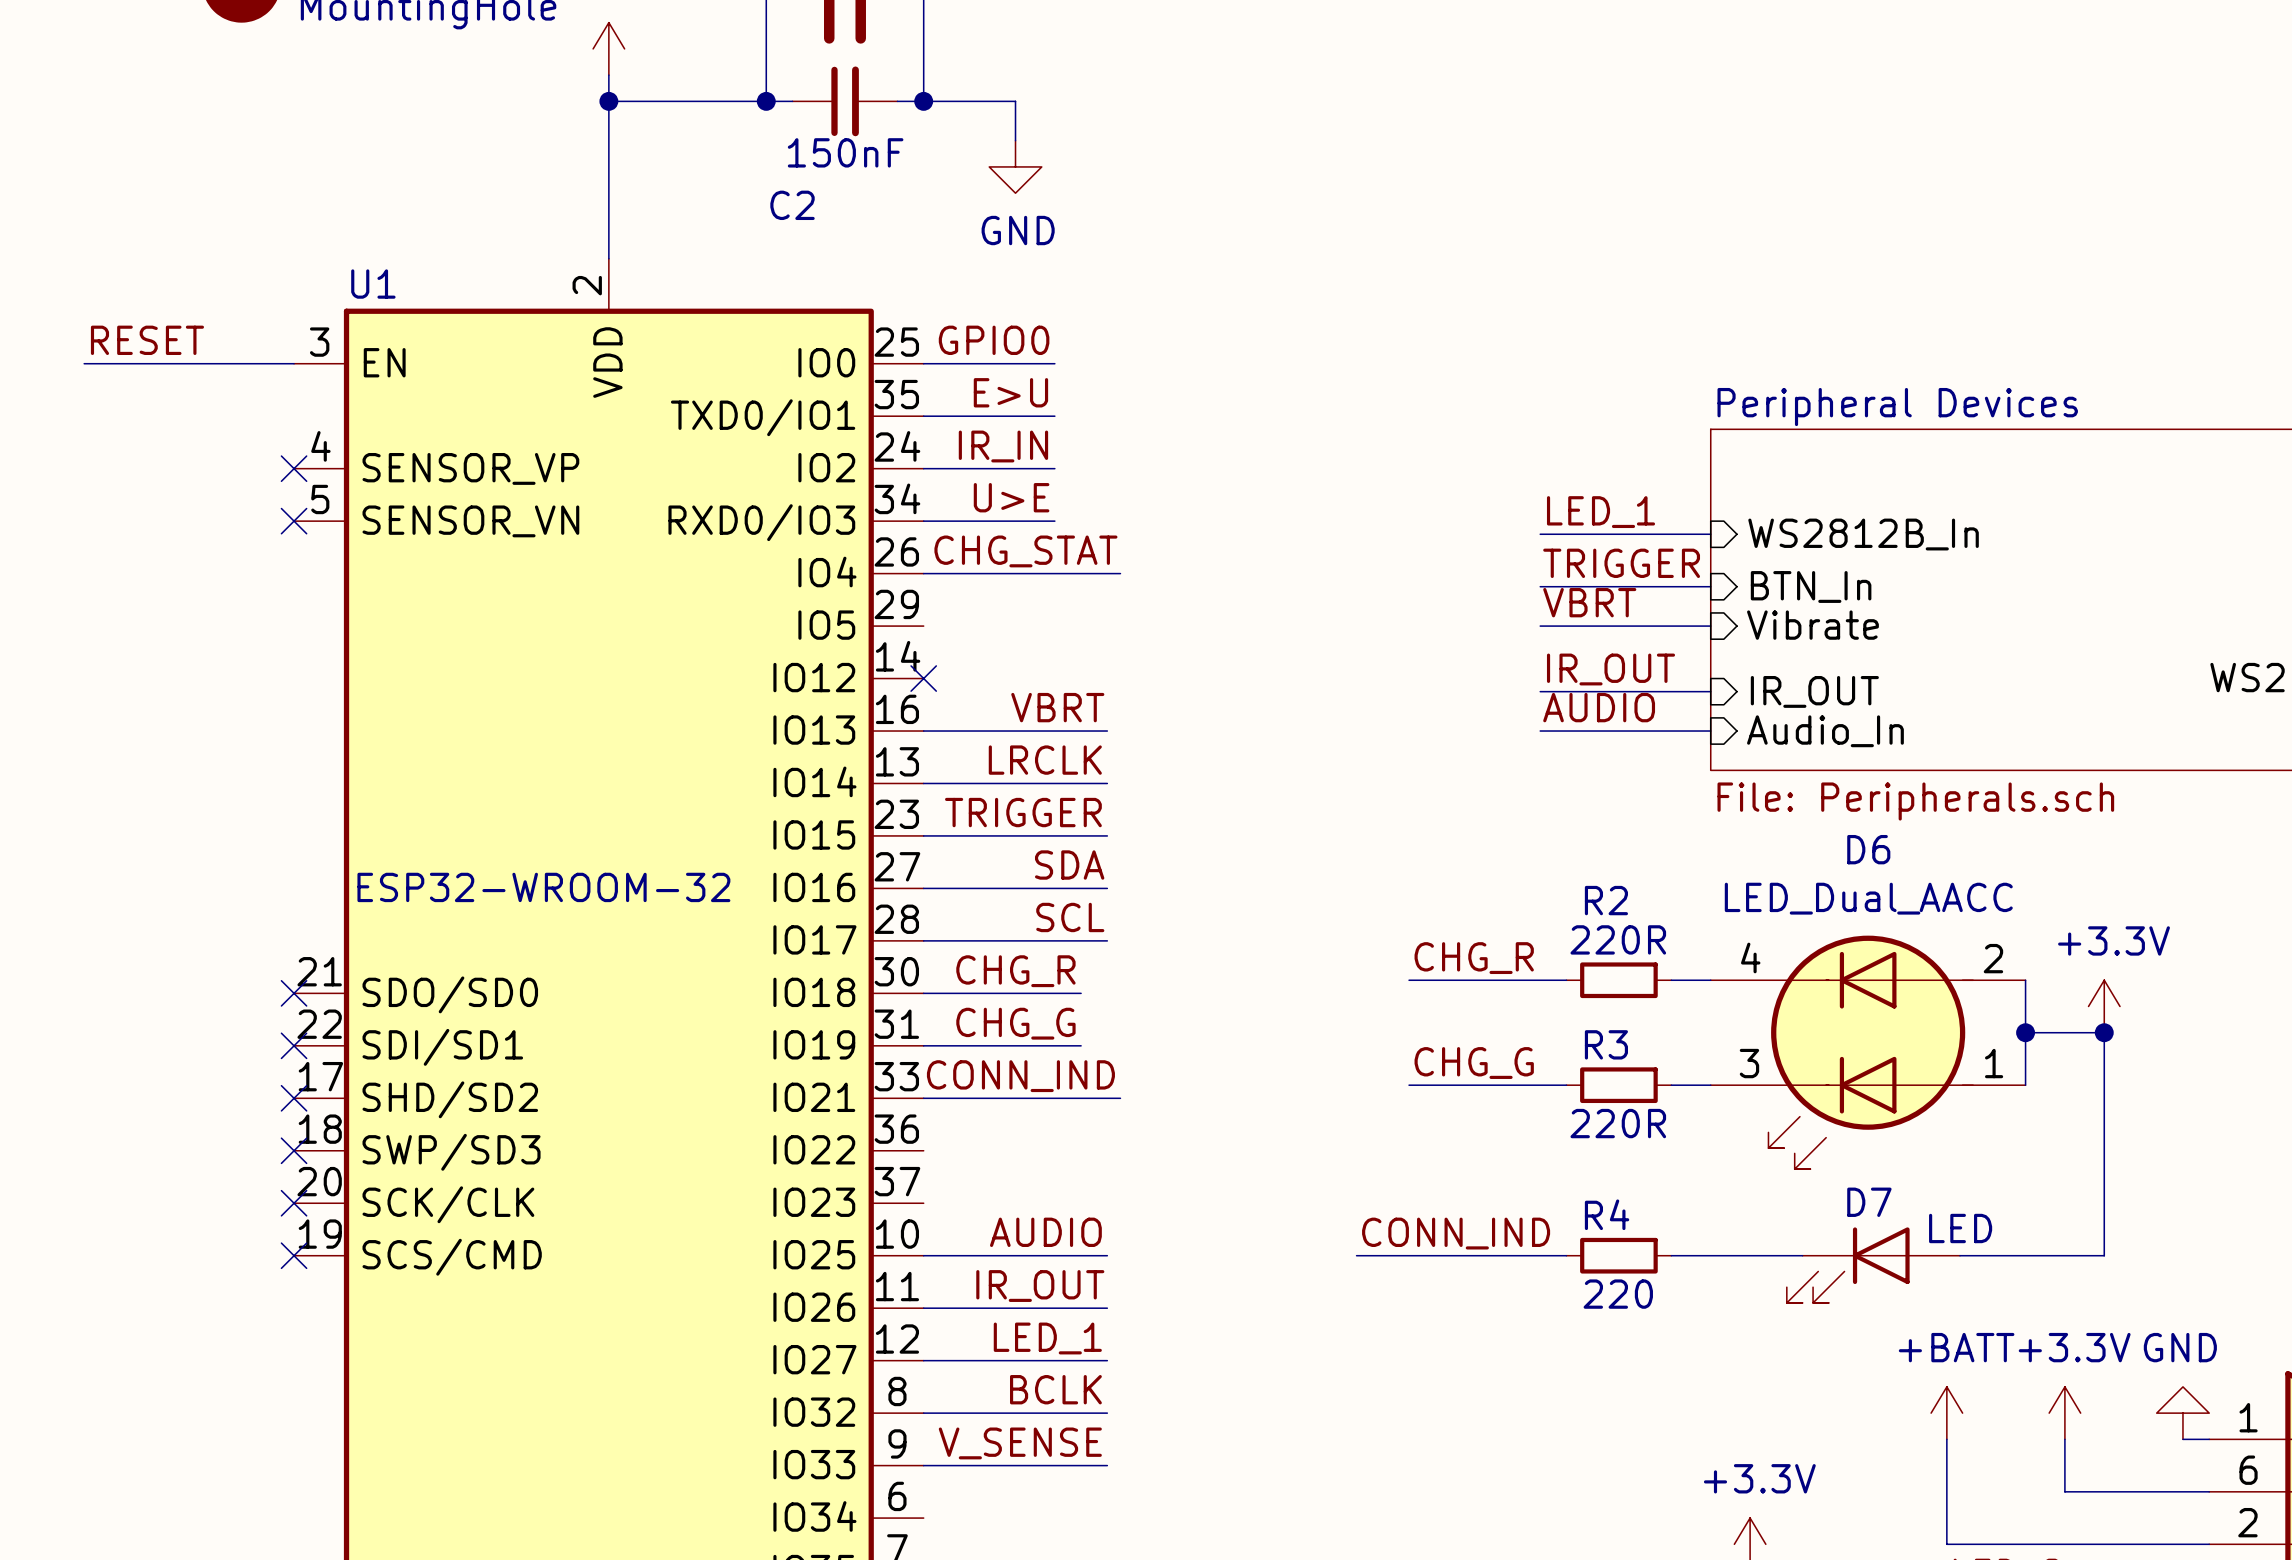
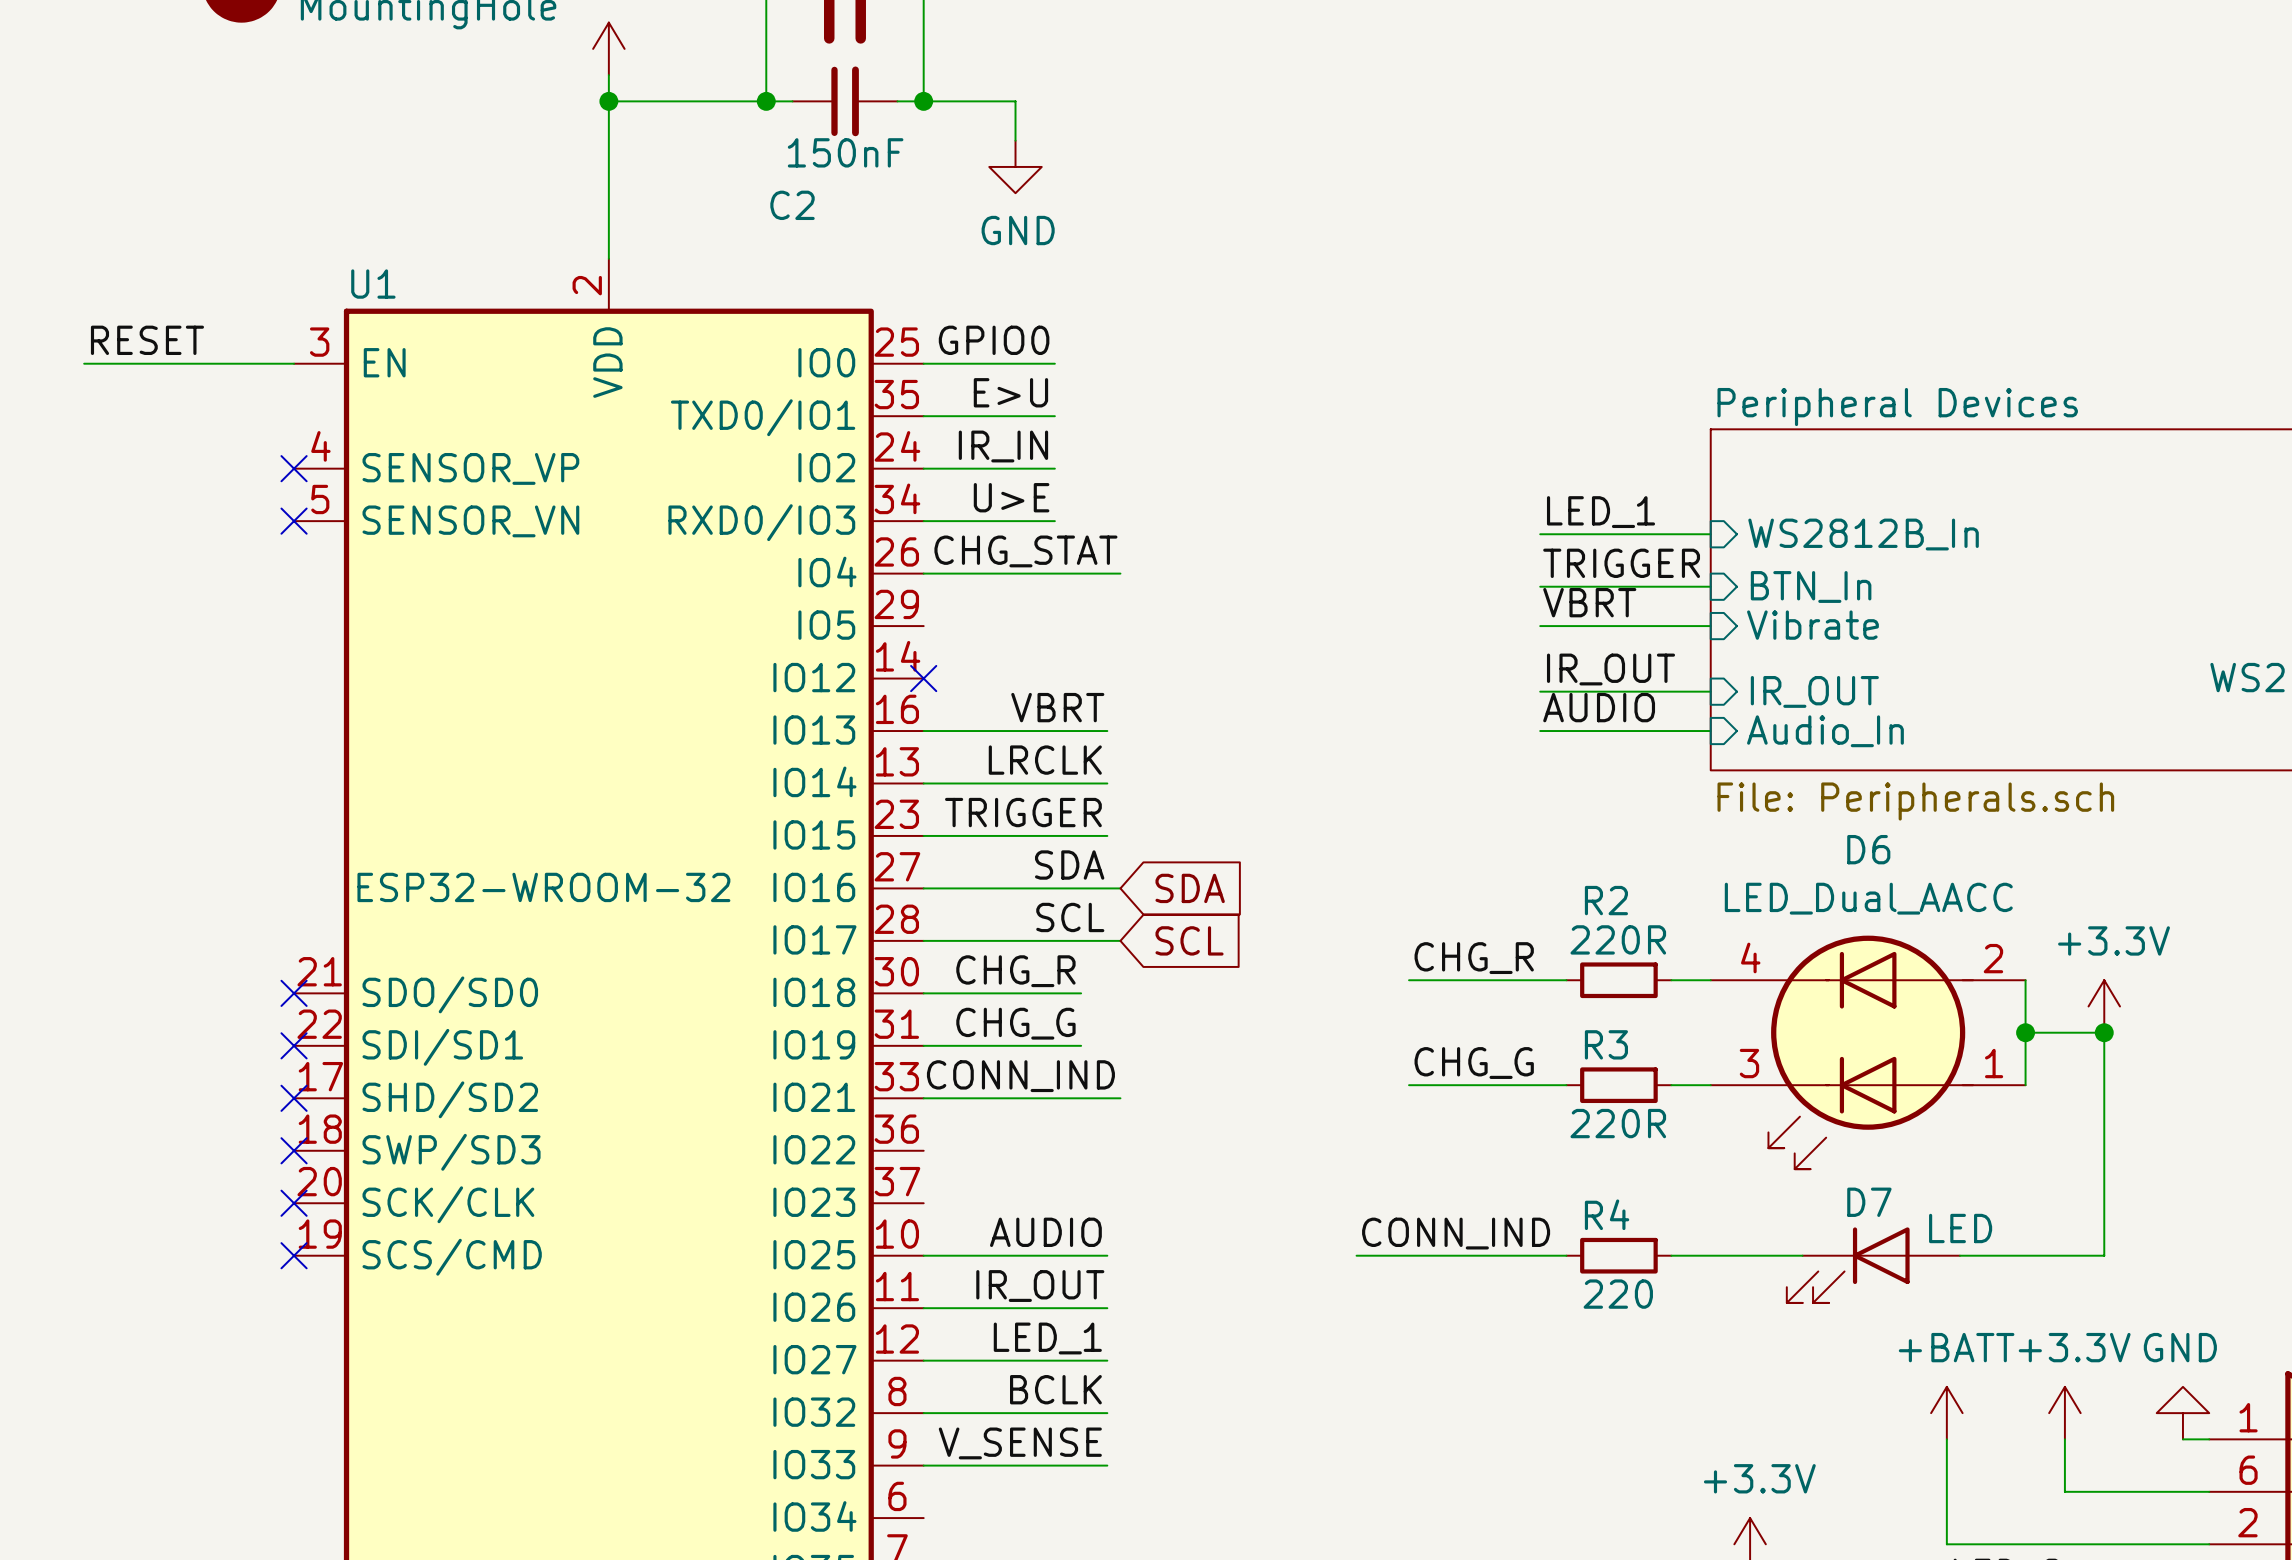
wire: none -> (1107, 888) (1120, 888)
global label: none -> SDA (1190, 888)
wire: none -> (1107, 940) (1120, 940)
global label: none -> SCL (1189, 940)

